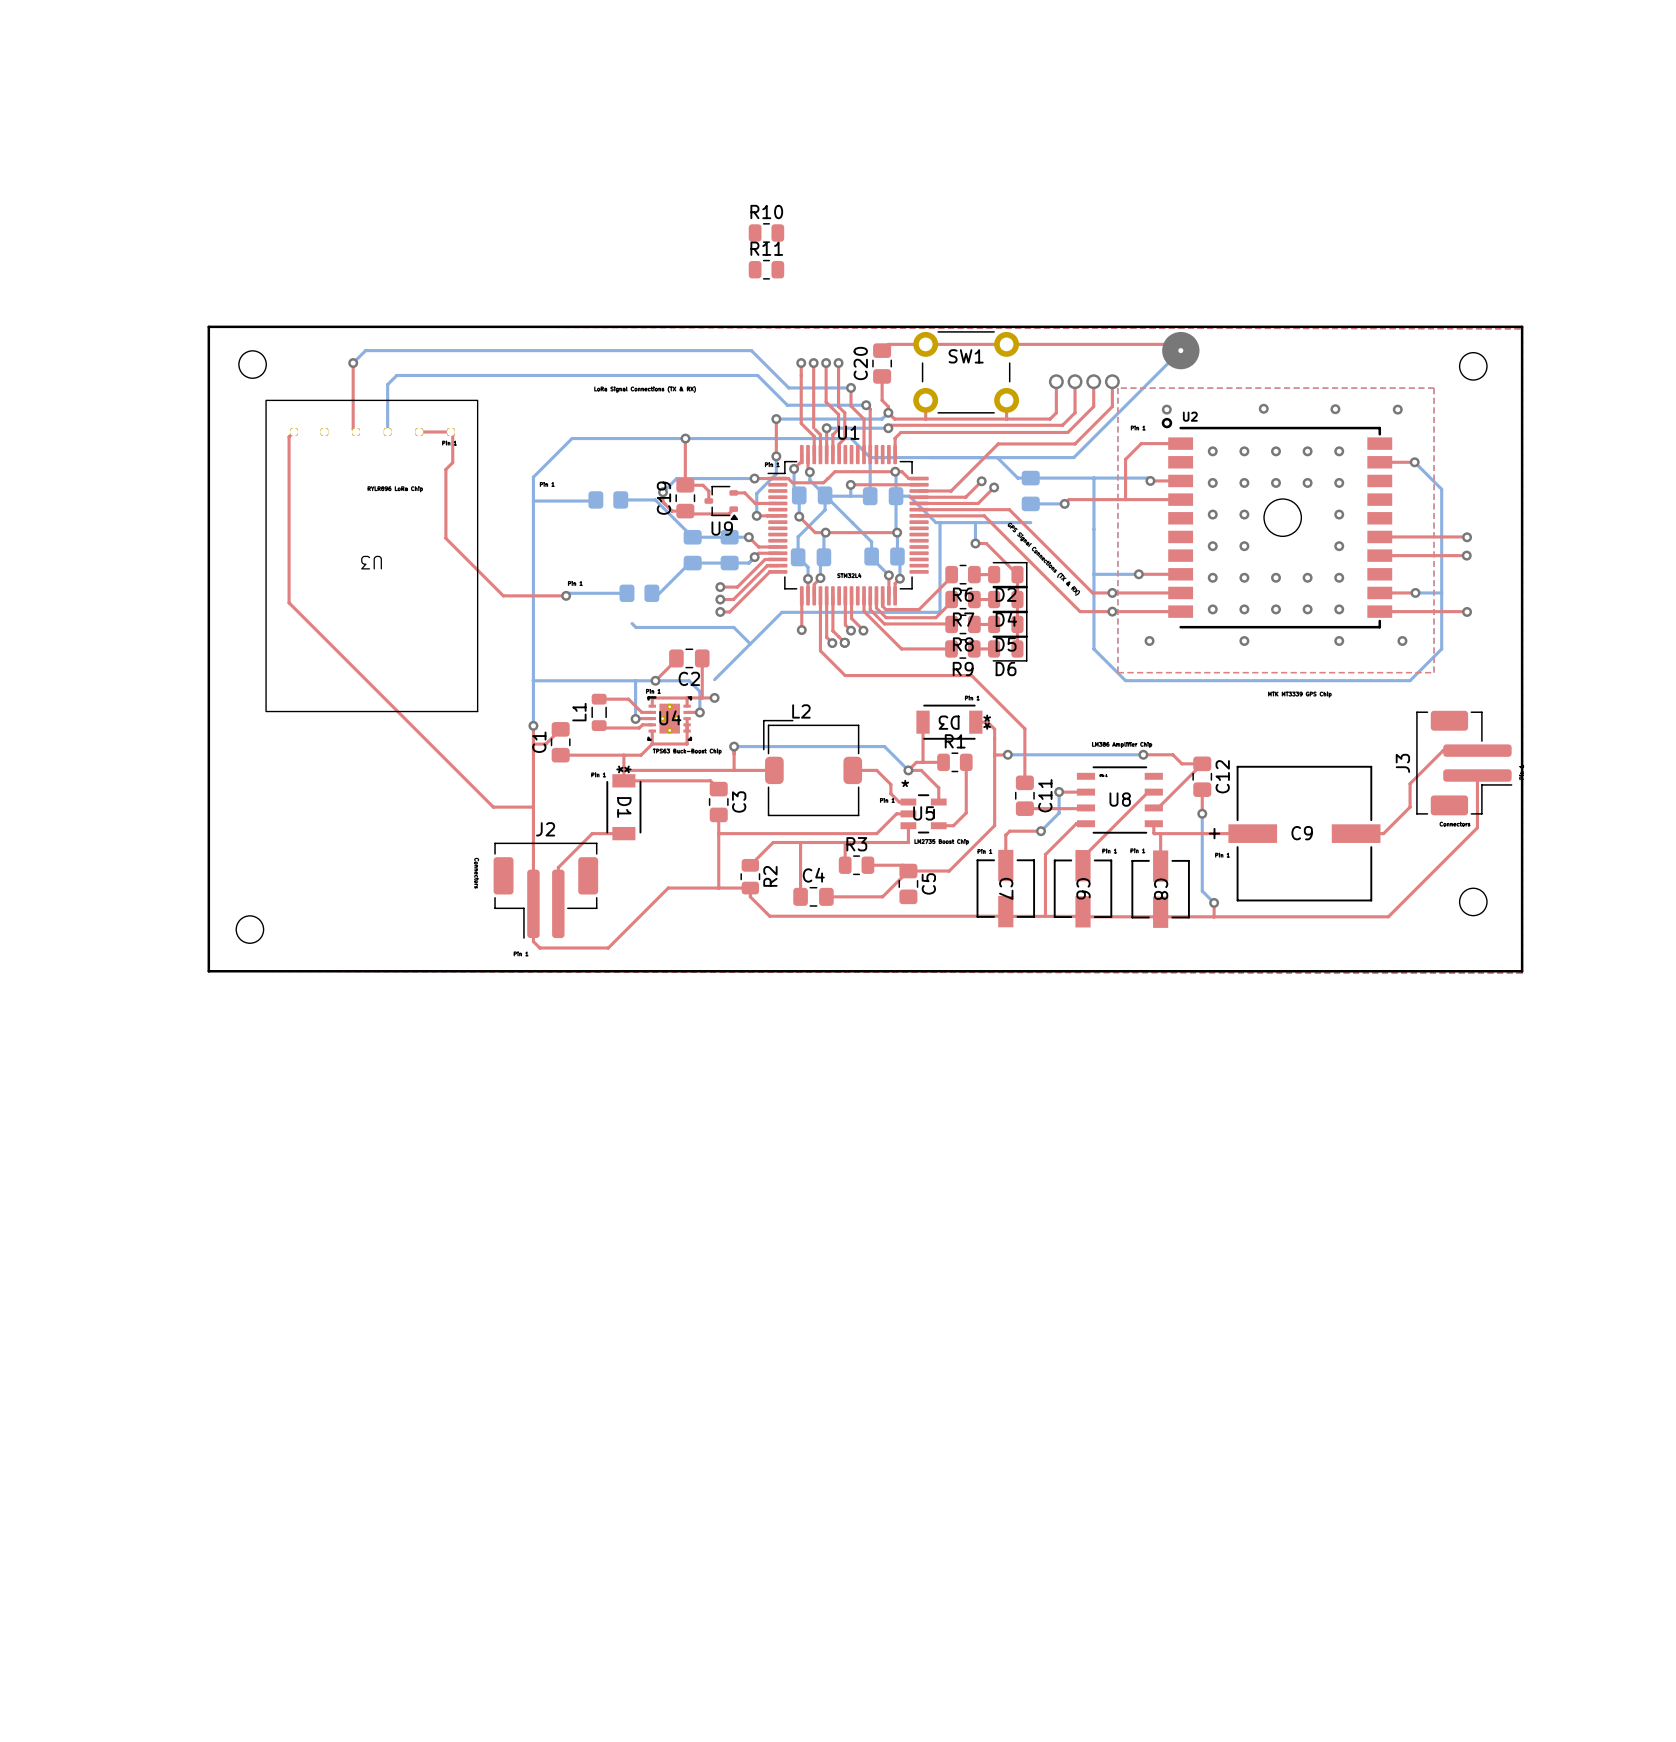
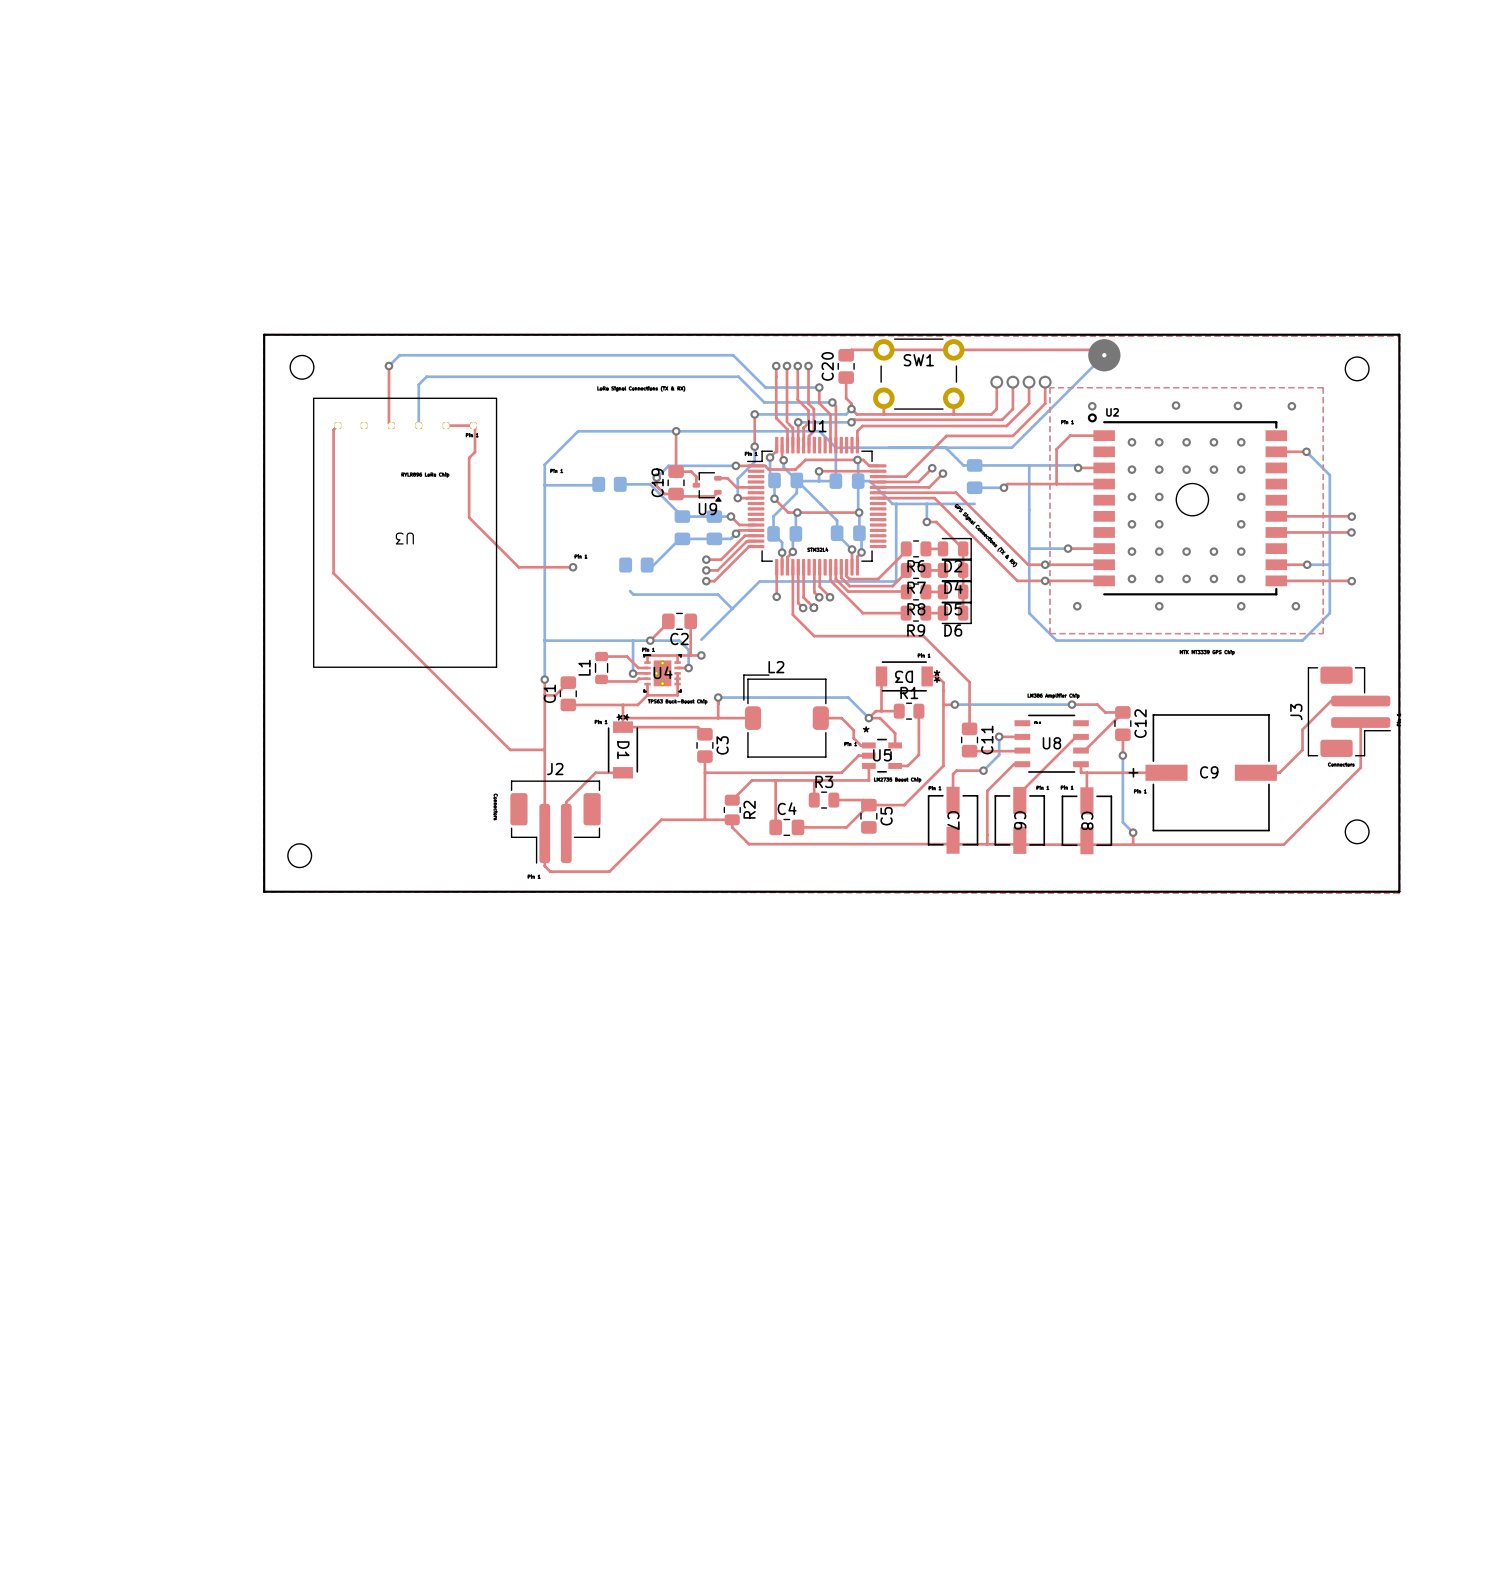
R10: (766, 232) -> none
R11: (766, 269) -> none
bottom track: (626, 593) (568, 593) (566, 595) -> none

